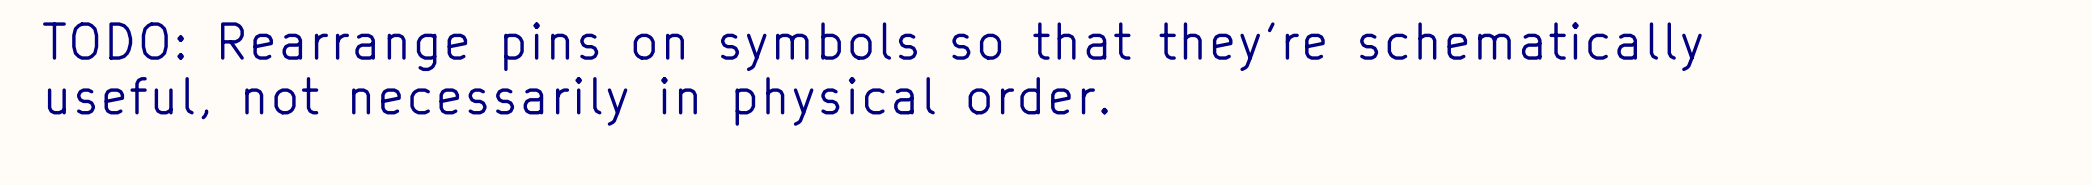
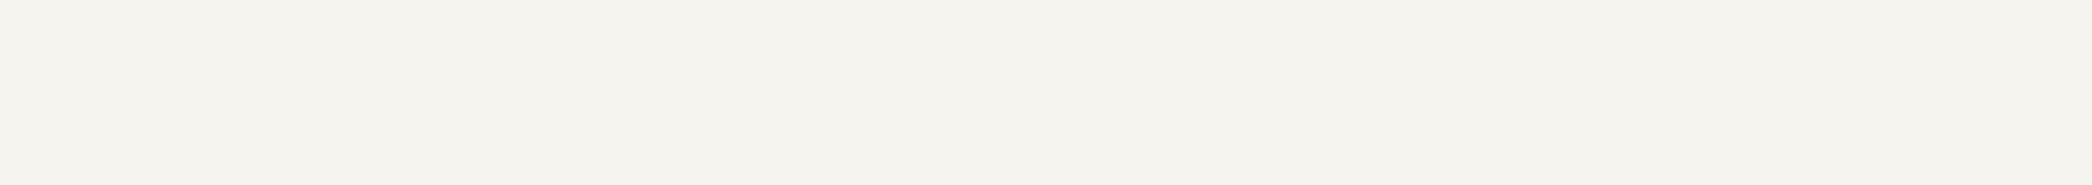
text: TODO: Rearrange pins on symbols so that they're schematically (872, 46) -> none
text: useful, not necessarily in physical order. (577, 101) -> none

